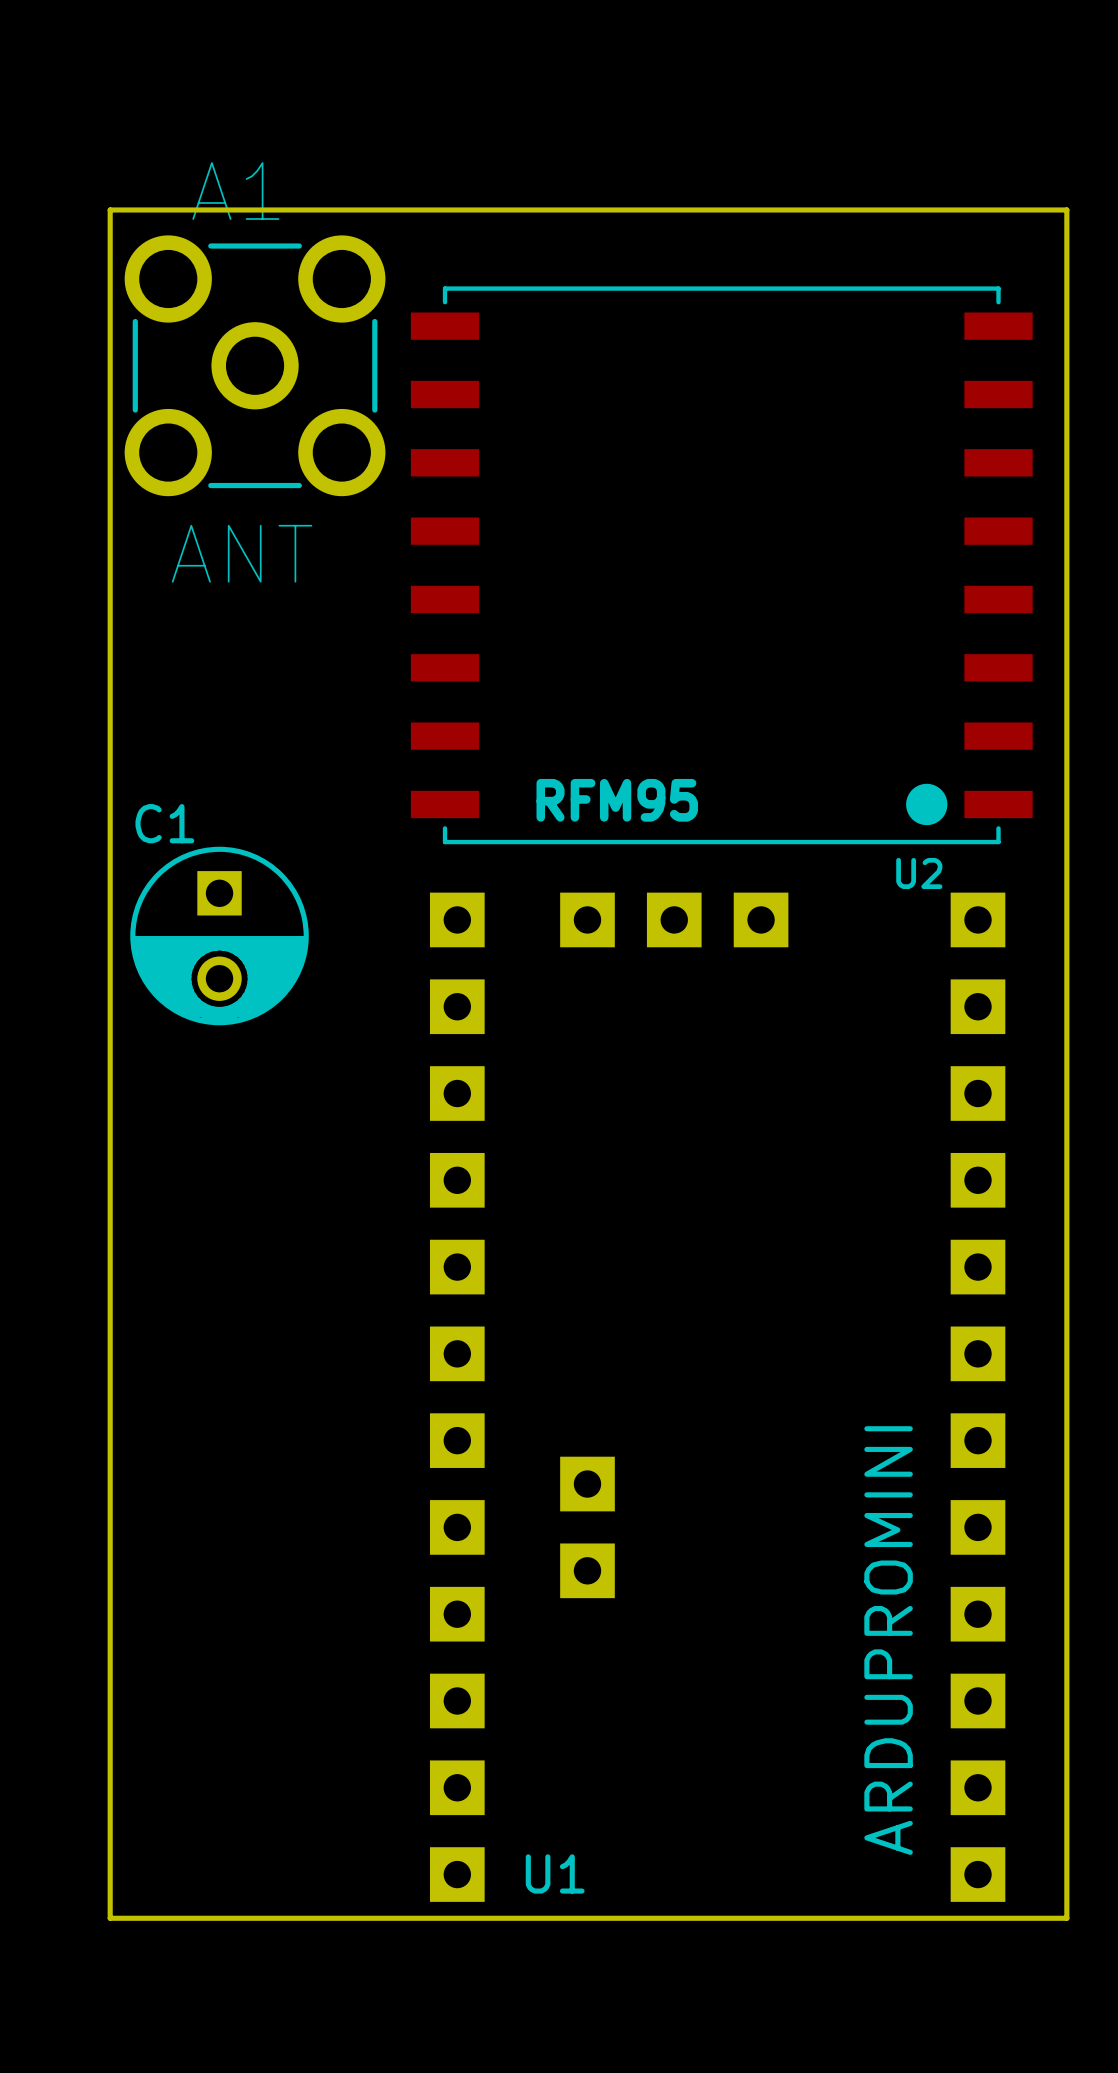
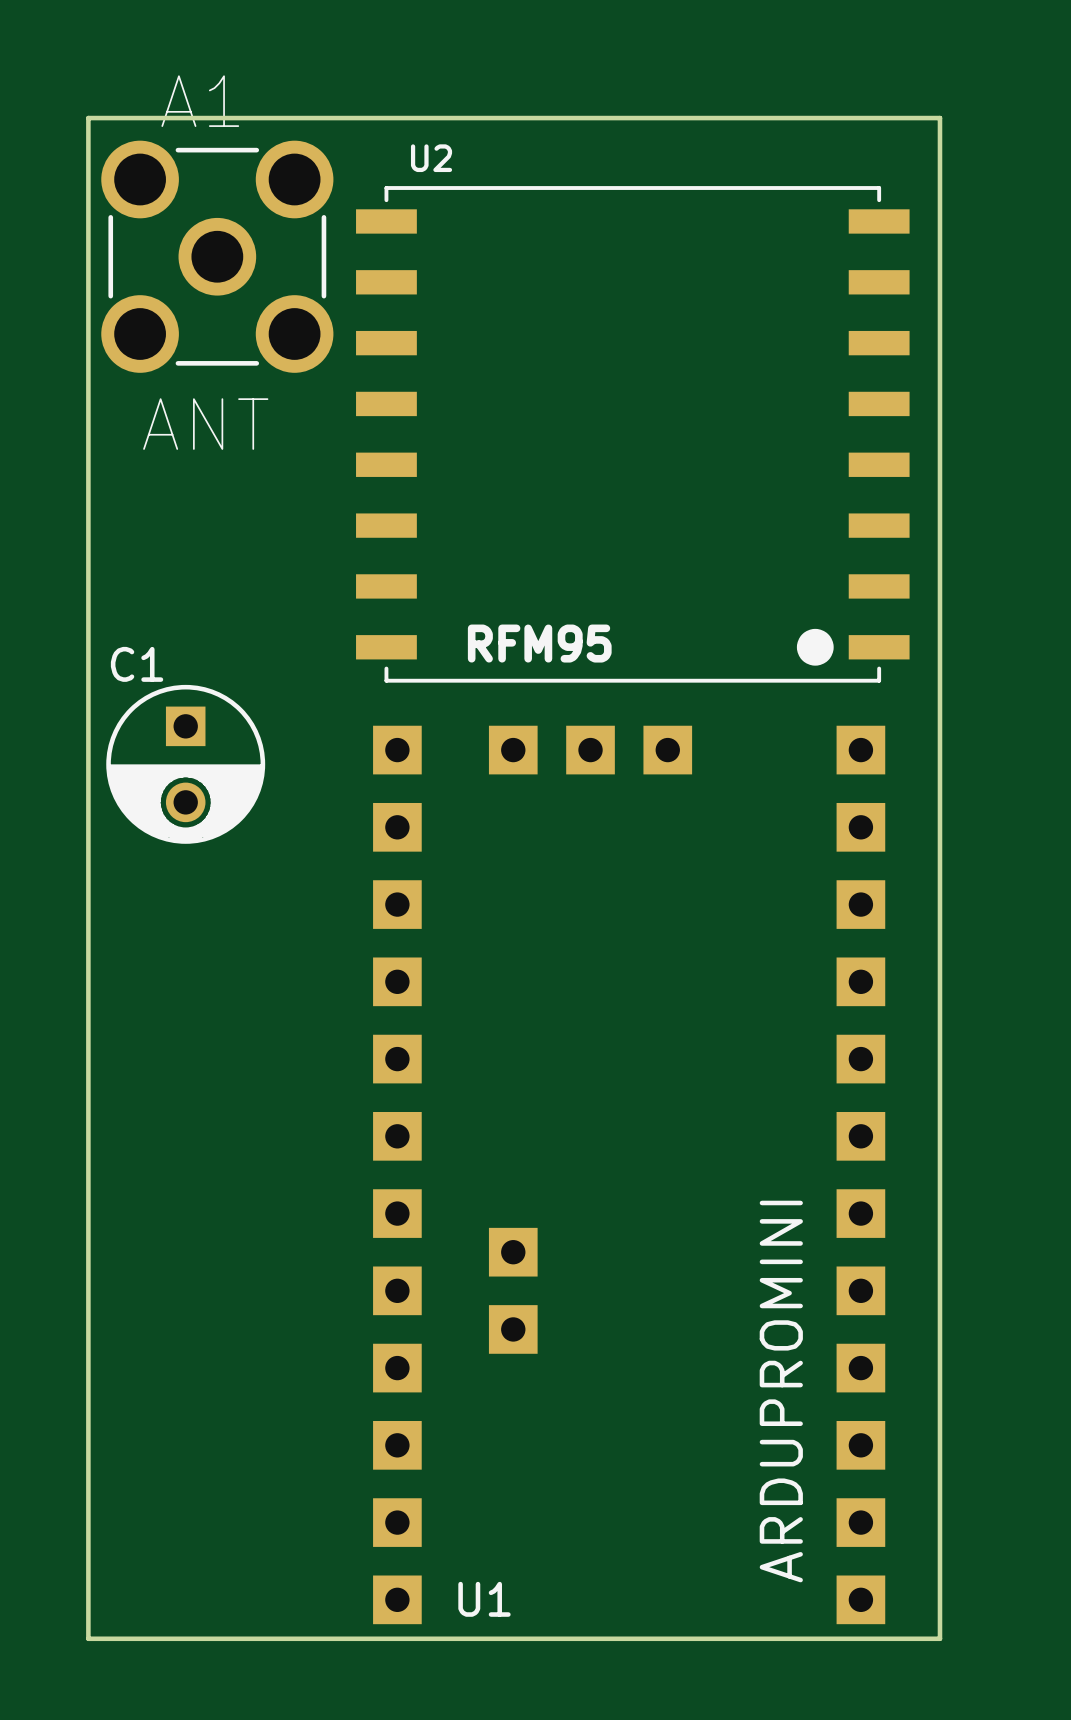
U2 name position: U2 (919, 873) -> U2 (431, 158)

